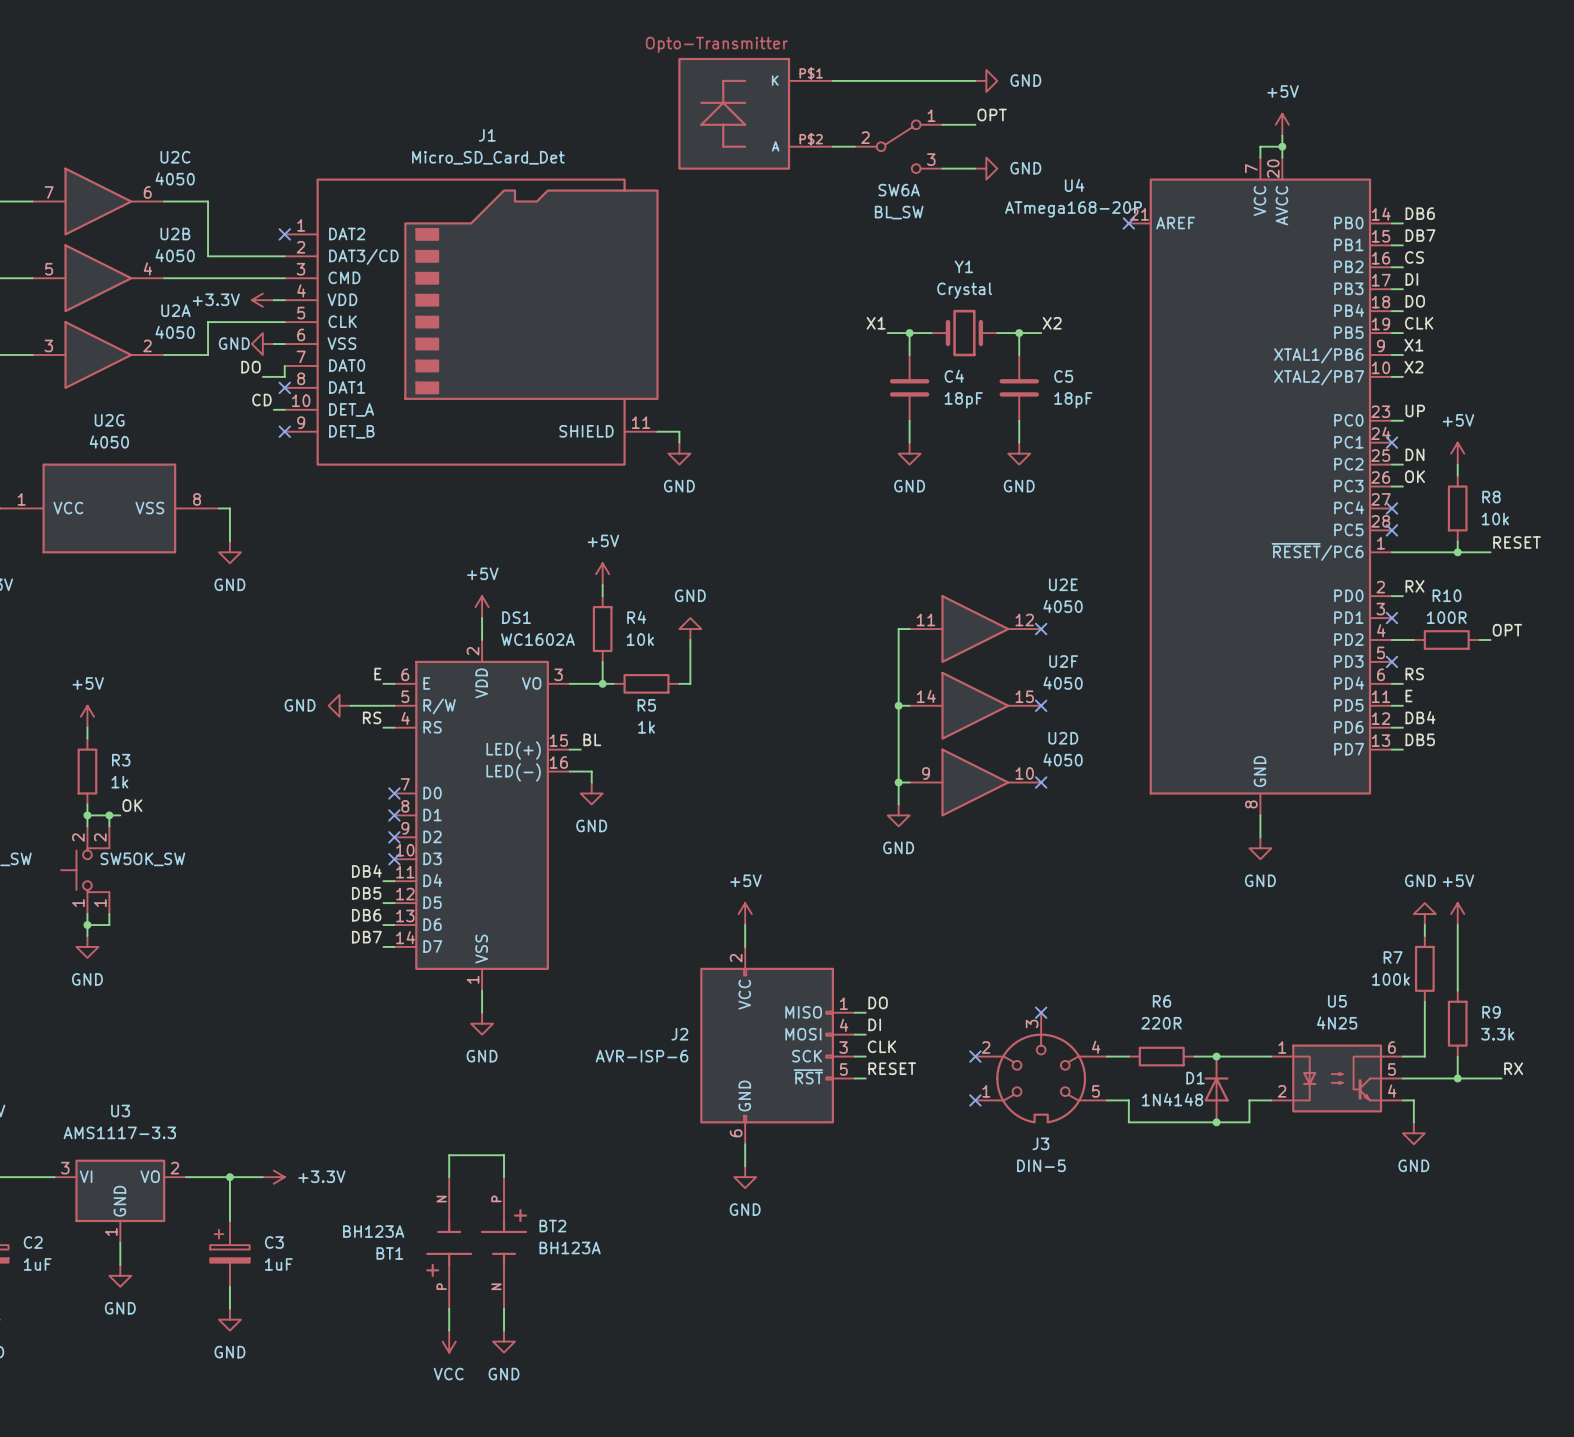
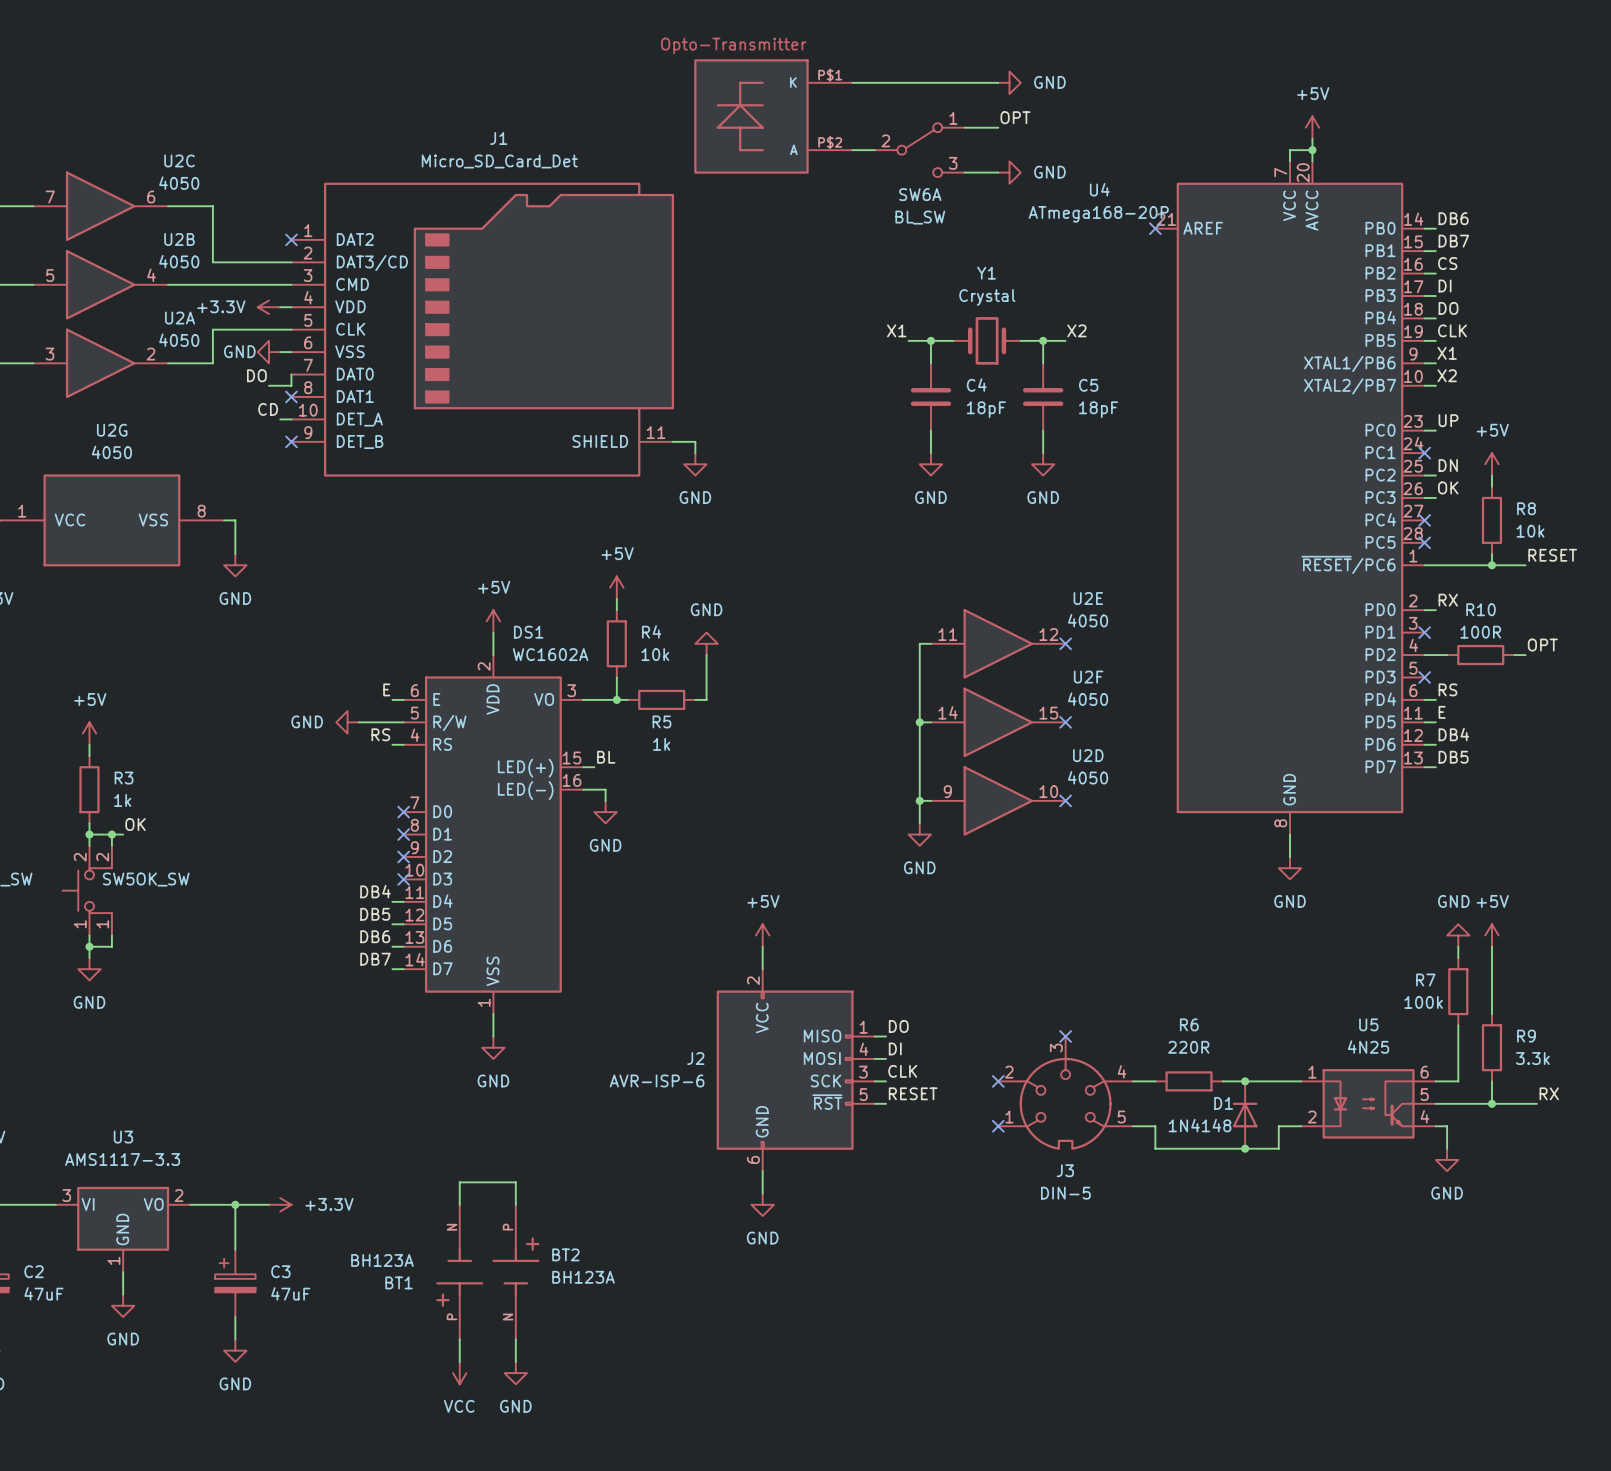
C2 value: 1uF (37, 1264) -> 47uF (43, 1293)
C3 value: 1uF (278, 1264) -> 47uF (290, 1293)

